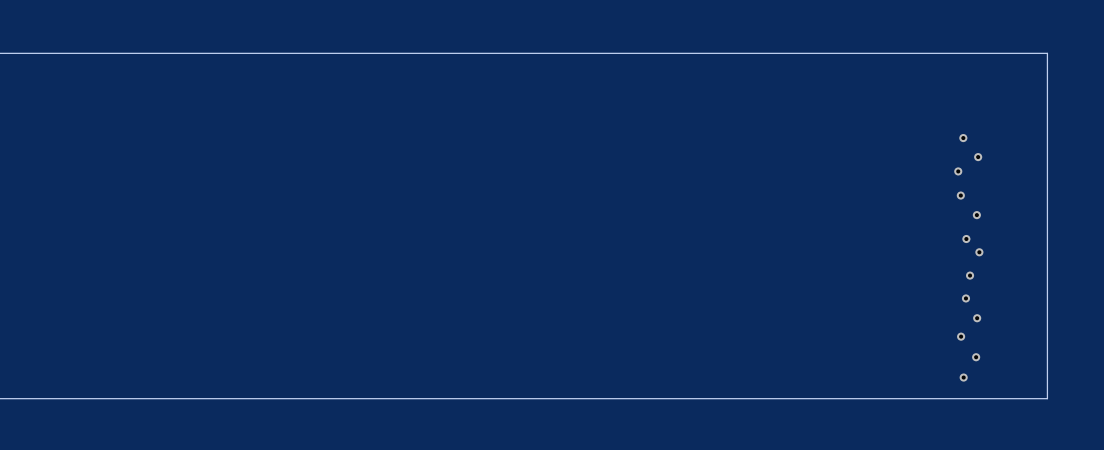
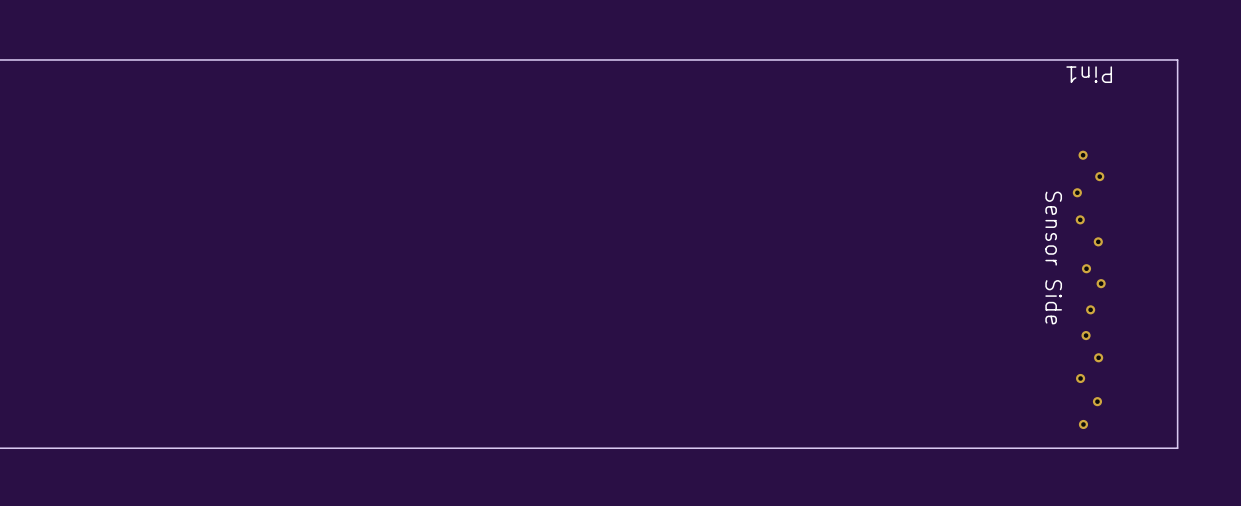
text: none -> Pin1 (1089, 74)
text: none -> Sensor Side (1053, 258)

